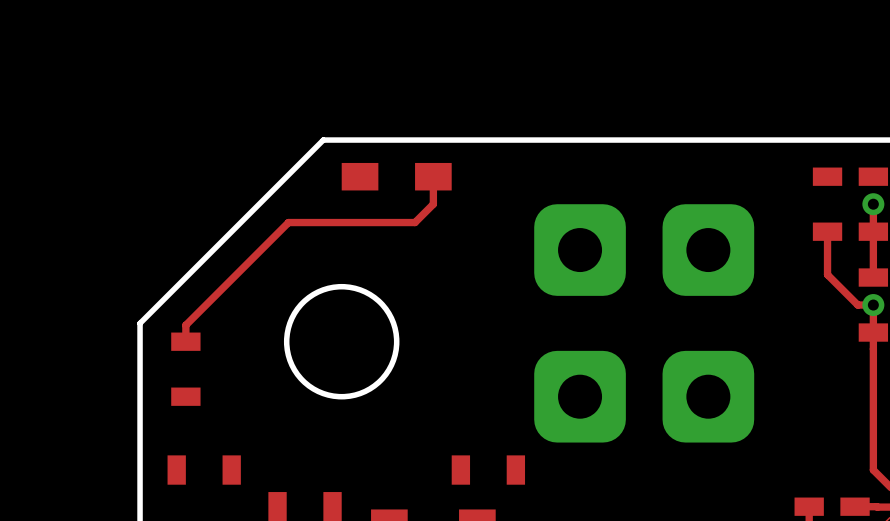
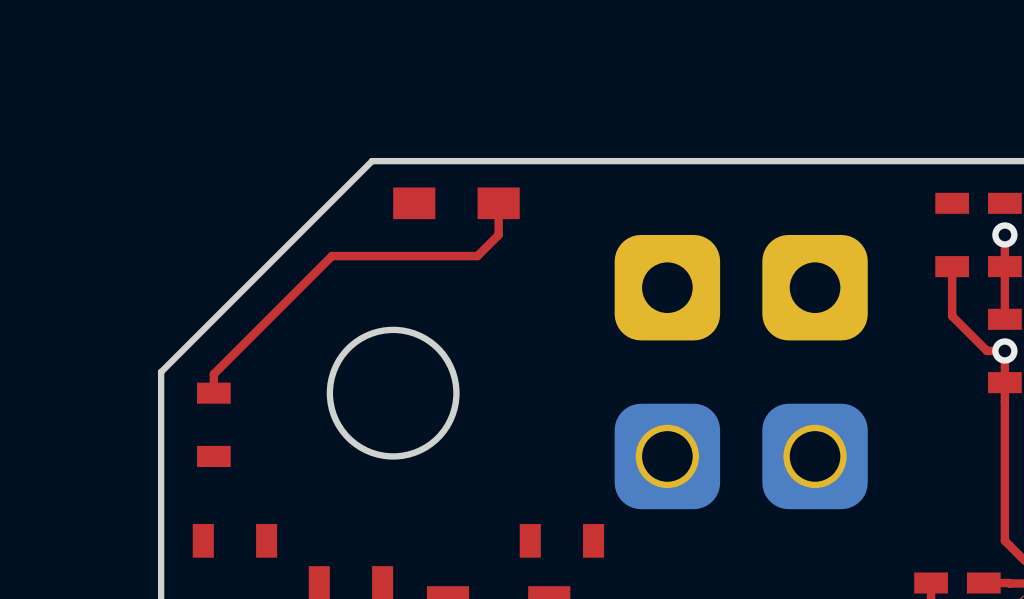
part footprint: [534, 350, 755, 443] -> [614, 403, 868, 510]

